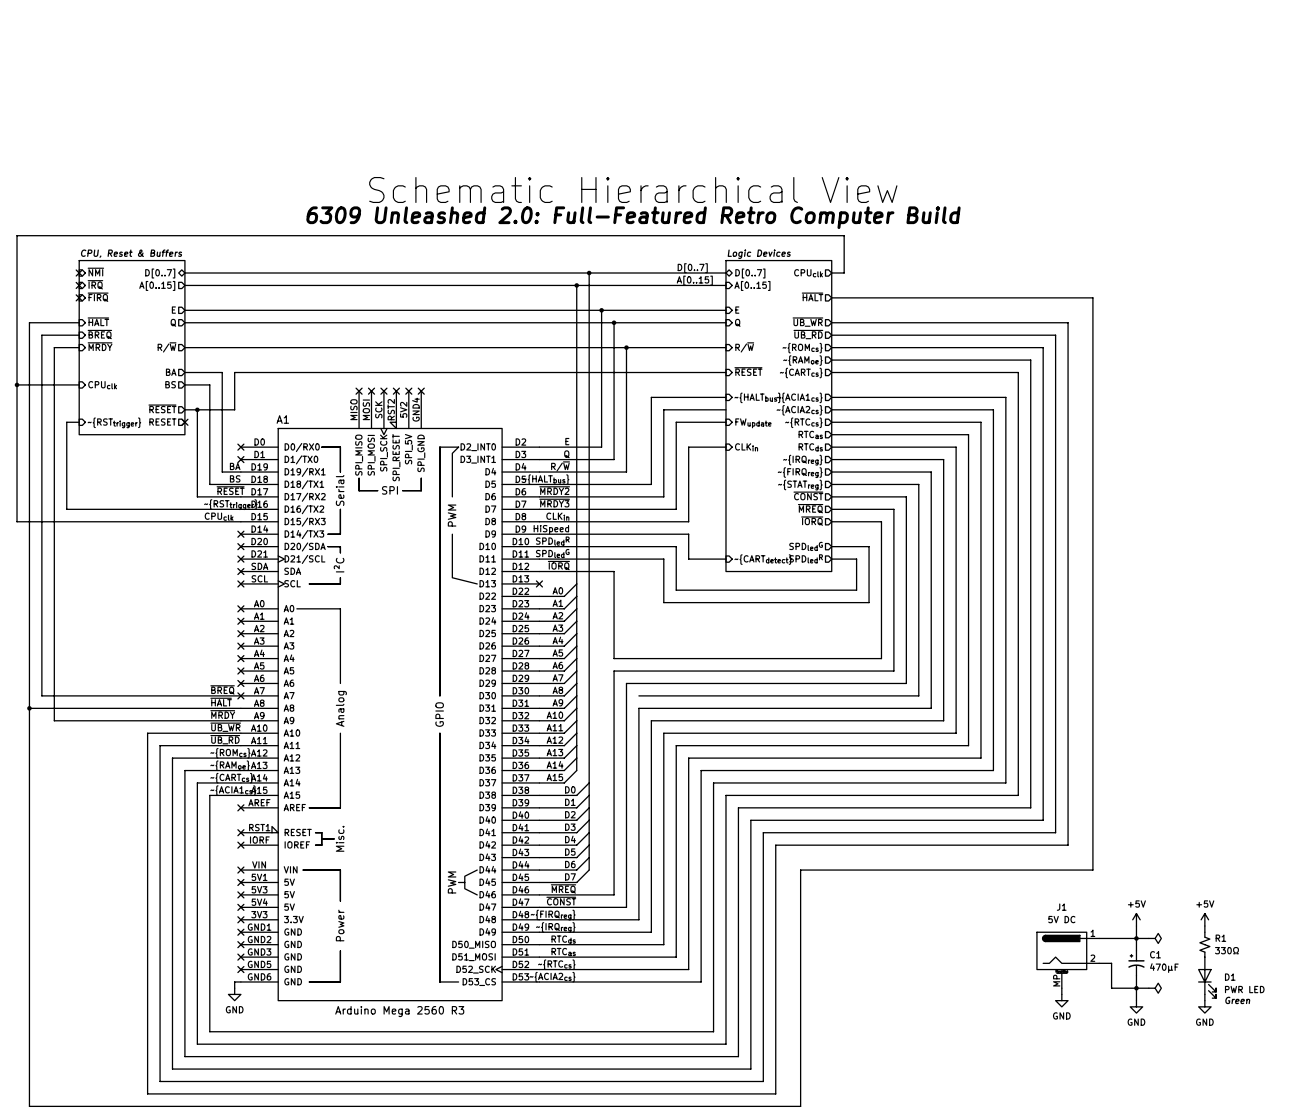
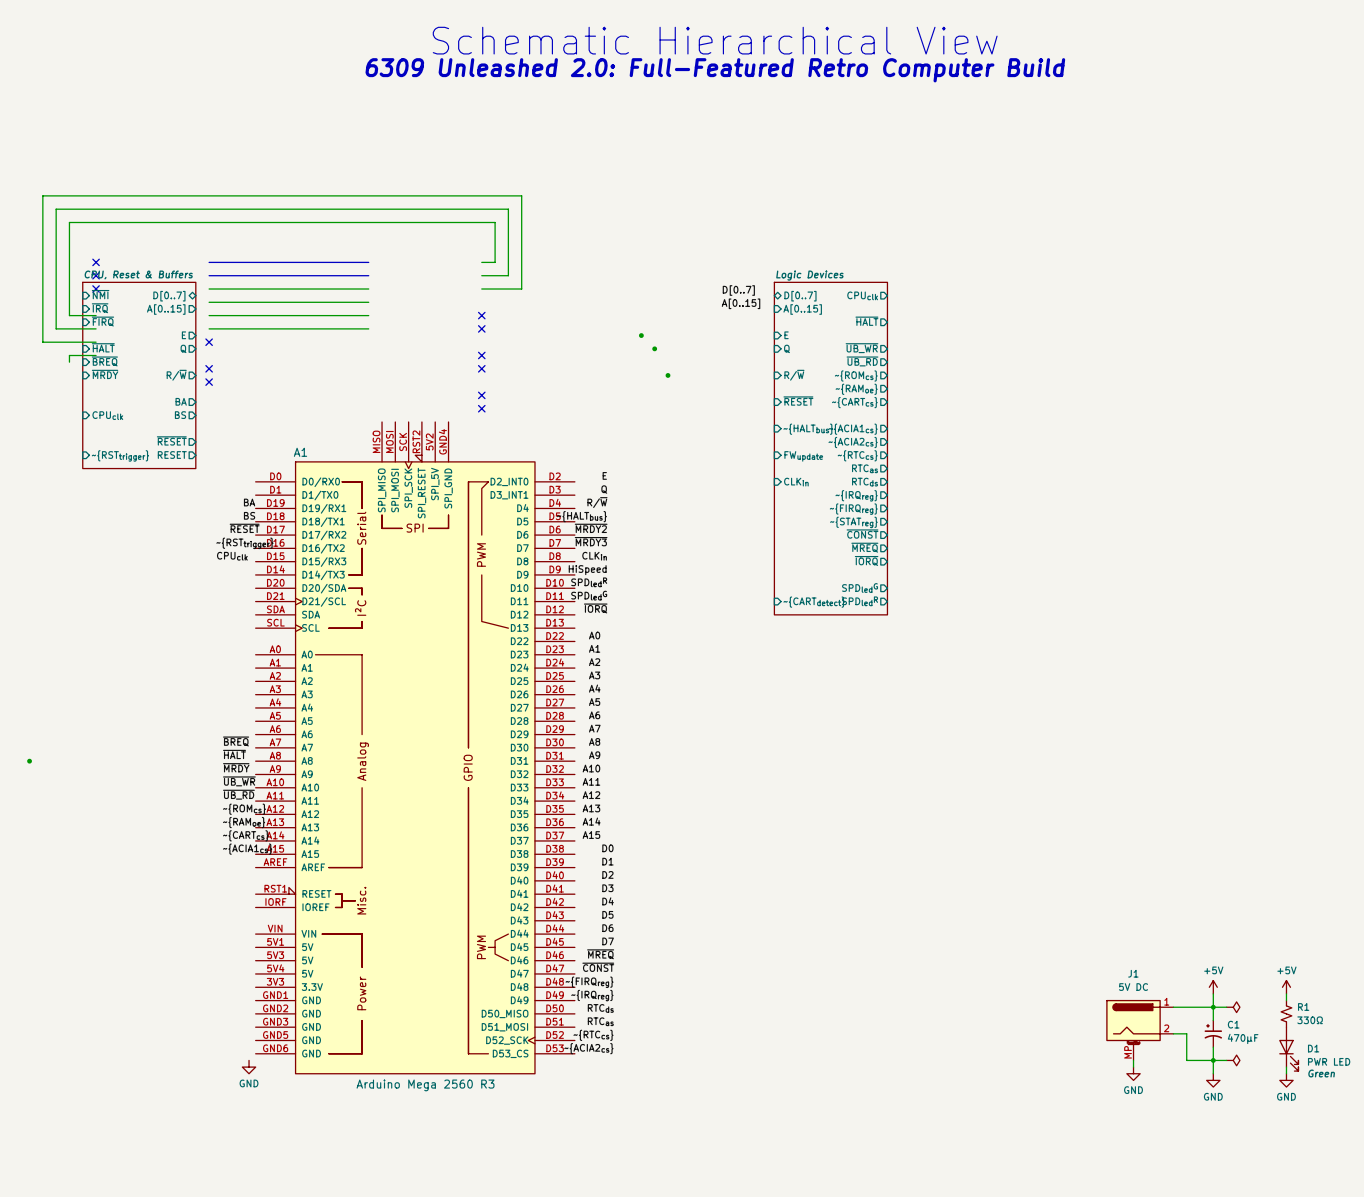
text: none -> Schematic Hierarchical View (715, 40)
text: none -> 6309 Unleashed 2.0: Full-Featured Retro Computer Build (715, 70)
text: Schematic Hierarchical View (633, 189) -> none
text: 6309 Unleashed 2.0: Full-Featured Retro Computer Build (633, 217) -> none
no-connect mark: none -> (96, 262)
bus: none -> (209, 262) (368, 262)
wire: none -> (481, 262) (495, 262) (495, 222) (69, 222) (69, 315) (96, 315)
no-connect mark: none -> (96, 275)
bus: none -> (209, 275) (368, 275)
wire: none -> (481, 275) (508, 275) (508, 209) (56, 209) (56, 328) (96, 328)
no-connect mark: none -> (96, 289)
wire: none -> (209, 289) (368, 289)
wire: none -> (481, 289) (521, 289) (521, 195) (42, 195) (42, 342) (96, 342)
no-connect mark: (79, 273) -> none
bus: (184, 273) (725, 273) -> none
bus: (589, 273) (589, 870) -> none
junction: (589, 273) -> none
wire: (831, 273) (844, 273) (844, 235) (17, 235) (17, 521) (240, 521) -> none
wire: none -> (209, 302) (368, 302)
no-connect mark: (79, 285) -> none
bus: (184, 285) (725, 285) -> none
bus: (576, 285) (576, 770) -> none
junction: (576, 285) -> none
wire: none -> (209, 315) (368, 315)
no-connect mark: none -> (481, 315)
no-connect mark: (79, 297) -> none
wire: (831, 297) (1092, 297) (1092, 870) (800, 870) (800, 1106) (29, 1106) (29, 322) (79, 322) -> none
wire: none -> (209, 328) (368, 328)
no-connect mark: none -> (481, 328)
wire: (184, 310) (725, 310) -> none
wire: (601, 310) (601, 447) (539, 447) -> none
no-connect mark: none -> (209, 342)
wire: (184, 322) (725, 322) -> none
wire: (614, 322) (614, 459) (539, 459) -> none
wire: (831, 322) (1068, 322) (1068, 845) (775, 845) (775, 1093) (147, 1093) (147, 733) (240, 733) -> none
wire: none -> (96, 355) (69, 355) (69, 362)
no-connect mark: none -> (481, 355)
wire: (79, 335) (41, 335) (41, 695) (240, 695) -> none
wire: (831, 335) (1055, 335) (1055, 832) (763, 832) (763, 1081) (160, 1081) (160, 745) (240, 745) -> none
no-connect mark: none -> (209, 368)
no-connect mark: none -> (481, 368)
wire: (79, 347) (54, 347) (54, 720) (240, 720) -> none
wire: (184, 347) (725, 347) -> none
wire: (626, 347) (626, 472) (539, 472) -> none
wire: (831, 347) (1043, 347) (1043, 820) (750, 820) (750, 1069) (172, 1069) (172, 758) (240, 758) -> none
no-connect mark: none -> (209, 382)
wire: (831, 360) (1030, 360) (1030, 807) (738, 807) (738, 1056) (184, 1056) (184, 770) (240, 770) -> none
no-connect mark: none -> (481, 395)
wire: (184, 372) (222, 372) (222, 472) (240, 472) -> none
wire: (725, 372) (234, 372) (234, 409) (184, 409) -> none
wire: (831, 372) (1018, 372) (1018, 795) (725, 795) (725, 1044) (197, 1044) (197, 782) (240, 782) -> none
no-connect mark: none -> (481, 408)
wire: (17, 384) (79, 384) -> none
junction: (17, 384) -> none
wire: (184, 384) (209, 384) (209, 484) (240, 484) -> none
no-connect mark: (359, 391) -> none
no-connect mark: (371, 391) -> none
no-connect mark: (383, 391) -> none
no-connect mark: (396, 391) -> none
no-connect mark: (408, 391) -> none
no-connect mark: (421, 391) -> none
wire: (725, 397) (651, 397) (651, 484) (539, 484) -> none
wire: (831, 397) (1005, 397) (1005, 782) (713, 782) (713, 1031) (209, 1031) (209, 795) (240, 795) -> none
wire: (197, 409) (197, 496) (240, 496) -> none
junction: (197, 409) -> none
wire: (725, 409) (663, 409) (663, 496) (539, 496) -> none
wire: (831, 409) (993, 409) (993, 770) (701, 770) (701, 981) (539, 981) -> none
wire: (79, 422) (66, 422) (66, 509) (240, 509) -> none
no-connect mark: (184, 422) -> none
wire: (725, 422) (676, 422) (676, 509) (539, 509) -> none
wire: (831, 422) (980, 422) (980, 758) (688, 758) (688, 969) (539, 969) -> none
wire: (831, 434) (968, 434) (968, 745) (676, 745) (676, 957) (539, 957) -> none
no-connect mark: (240, 447) -> none
wire: (725, 447) (688, 447) (688, 521) (539, 521) -> none
wire: (831, 447) (956, 447) (956, 733) (663, 733) (663, 944) (539, 944) -> none
no-connect mark: (240, 459) -> none
wire: (831, 459) (943, 459) (943, 720) (651, 720) (651, 932) (539, 932) -> none
wire: (831, 472) (931, 472) (931, 708) (638, 708) (638, 919) (539, 919) -> none
wire: (831, 484) (918, 484) (918, 695) (638, 695) -> none
wire: (831, 496) (906, 496) (906, 683) (626, 683) (626, 907) (539, 907) -> none
wire: (831, 509) (893, 509) (893, 671) (614, 671) (614, 894) (539, 894) -> none
wire: (831, 521) (881, 521) (881, 658) (614, 658) (614, 571) (539, 571) -> none
no-connect mark: (240, 534) -> none
wire: (539, 534) (688, 534) (688, 559) (725, 559) -> none
no-connect mark: (240, 546) -> none
wire: (539, 546) (676, 546) (676, 590) (856, 590) (856, 559) (831, 559) -> none
wire: (831, 546) (869, 546) (869, 602) (663, 602) (663, 559) (539, 559) -> none
no-connect mark: (240, 559) -> none
no-connect mark: (240, 571) -> none
no-connect mark: (240, 583) -> none
no-connect mark: (539, 583) -> none
wire: (576, 583) (564, 596) (539, 596) -> none
wire: (576, 596) (564, 608) (539, 608) -> none
no-connect mark: (240, 608) -> none
wire: (576, 608) (564, 621) (539, 621) -> none
no-connect mark: (240, 621) -> none
wire: (576, 621) (564, 633) (539, 633) -> none
no-connect mark: (240, 633) -> none
wire: (576, 633) (564, 646) (539, 646) -> none
no-connect mark: (240, 646) -> none
wire: (576, 646) (564, 658) (539, 658) -> none
no-connect mark: (240, 658) -> none
wire: (576, 658) (564, 671) (539, 671) -> none
no-connect mark: (240, 671) -> none
wire: (576, 671) (564, 683) (539, 683) -> none
no-connect mark: (240, 683) -> none
wire: (576, 683) (564, 695) (539, 695) -> none
no-connect mark: (240, 695) -> none
wire: (576, 695) (564, 708) (539, 708) -> none
wire: (29, 708) (240, 708) -> none
wire: (576, 708) (564, 720) (539, 720) -> none
wire: (576, 720) (564, 733) (539, 733) -> none
wire: (576, 733) (564, 745) (539, 745) -> none
wire: (576, 745) (564, 758) (539, 758) -> none
wire: (576, 758) (564, 770) (539, 770) -> none
wire: (576, 770) (564, 782) (539, 782) -> none
wire: (589, 782) (576, 795) (539, 795) -> none
wire: (589, 795) (576, 807) (539, 807) -> none
no-connect mark: (240, 807) -> none
wire: (589, 807) (576, 820) (539, 820) -> none
wire: (589, 820) (576, 832) (539, 832) -> none
no-connect mark: (240, 832) -> none
wire: (589, 832) (576, 845) (539, 845) -> none
no-connect mark: (240, 845) -> none
wire: (589, 845) (576, 857) (539, 857) -> none
wire: (589, 857) (576, 870) (539, 870) -> none
no-connect mark: (240, 870) -> none
wire: (589, 870) (576, 882) (539, 882) -> none
no-connect mark: (240, 882) -> none
no-connect mark: (240, 894) -> none
no-connect mark: (240, 907) -> none
no-connect mark: (240, 919) -> none
no-connect mark: (240, 932) -> none
no-connect mark: (240, 944) -> none
no-connect mark: (240, 957) -> none
no-connect mark: (240, 969) -> none
wire: (240, 981) (234, 981) (234, 988) -> none

